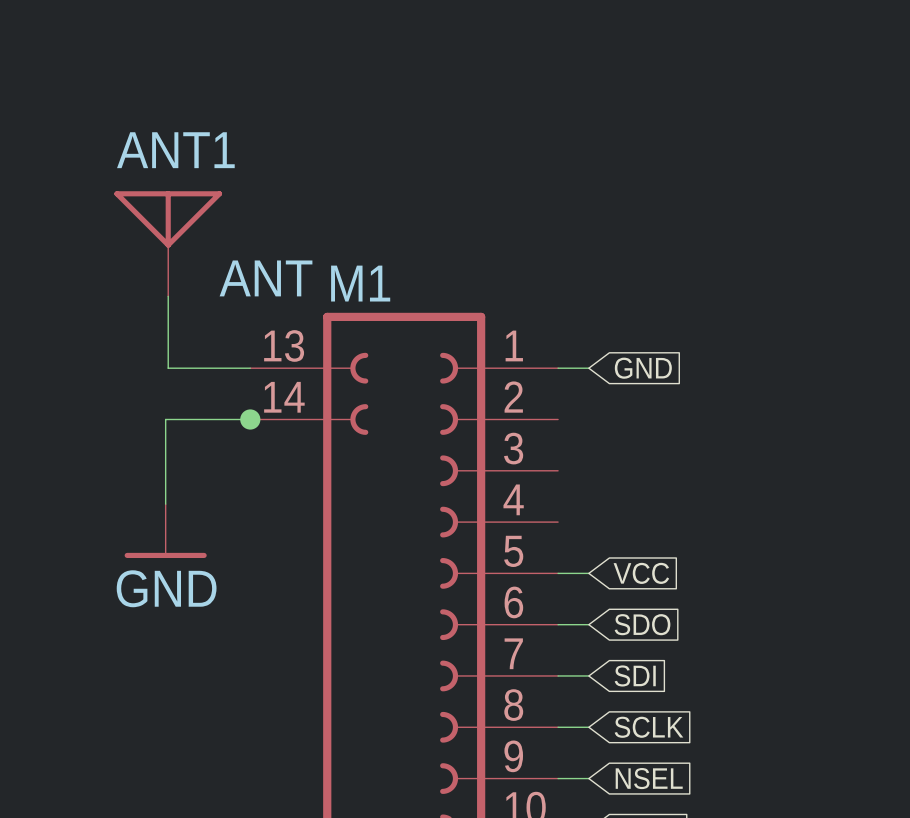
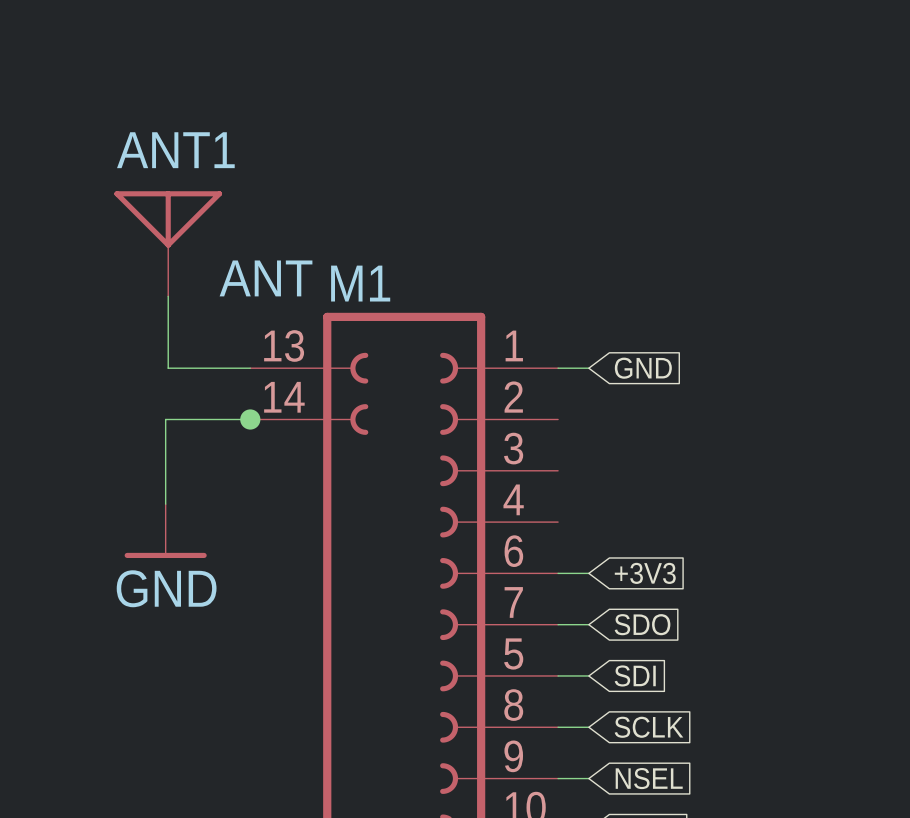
M1 pin number: 5 (513, 551) -> 6 (513, 551)
global label: VCC (641, 573) -> +3V3 (645, 573)
M1 pin number: 6 (513, 602) -> 7 (513, 602)
M1 pin number: 7 (513, 653) -> 5 (513, 653)

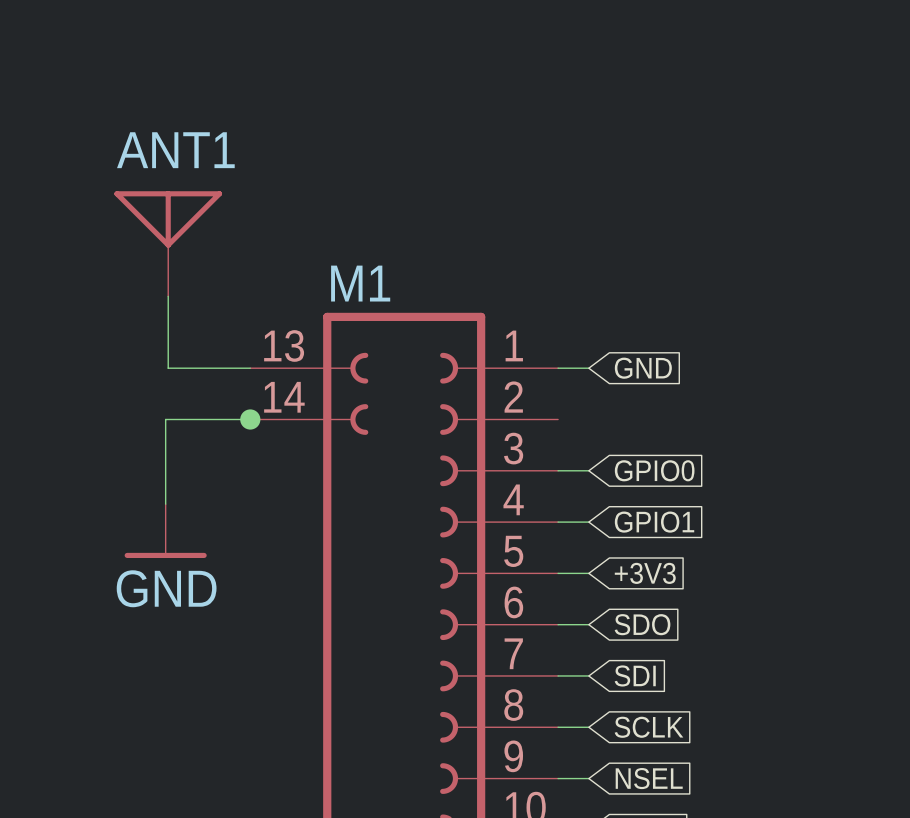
ANT1 value: ANT (266, 278) -> none
wire: none -> (558, 470) (588, 470)
global label: none -> GPIO0 (654, 470)
wire: none -> (558, 522) (588, 522)
global label: none -> GPIO1 (654, 522)
M1 pin number: 6 (513, 551) -> 5 (513, 551)
M1 pin number: 7 (513, 602) -> 6 (513, 602)
M1 pin number: 5 (513, 653) -> 7 (513, 653)

